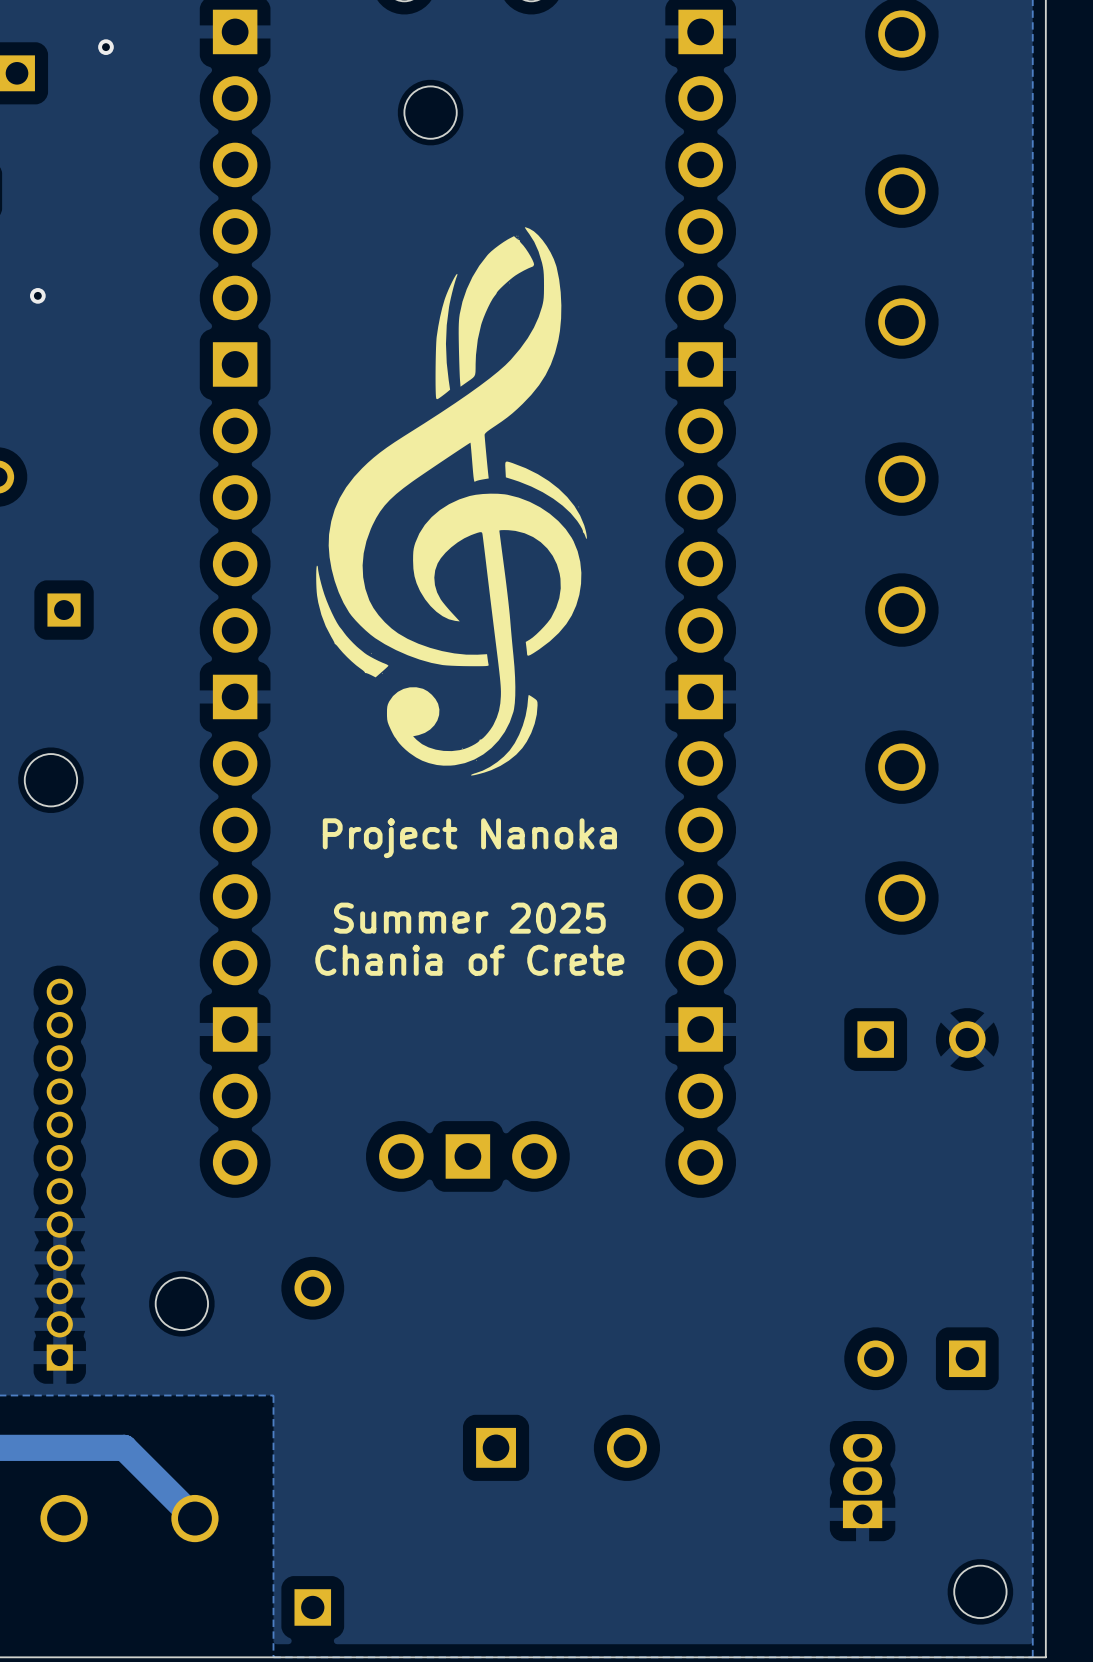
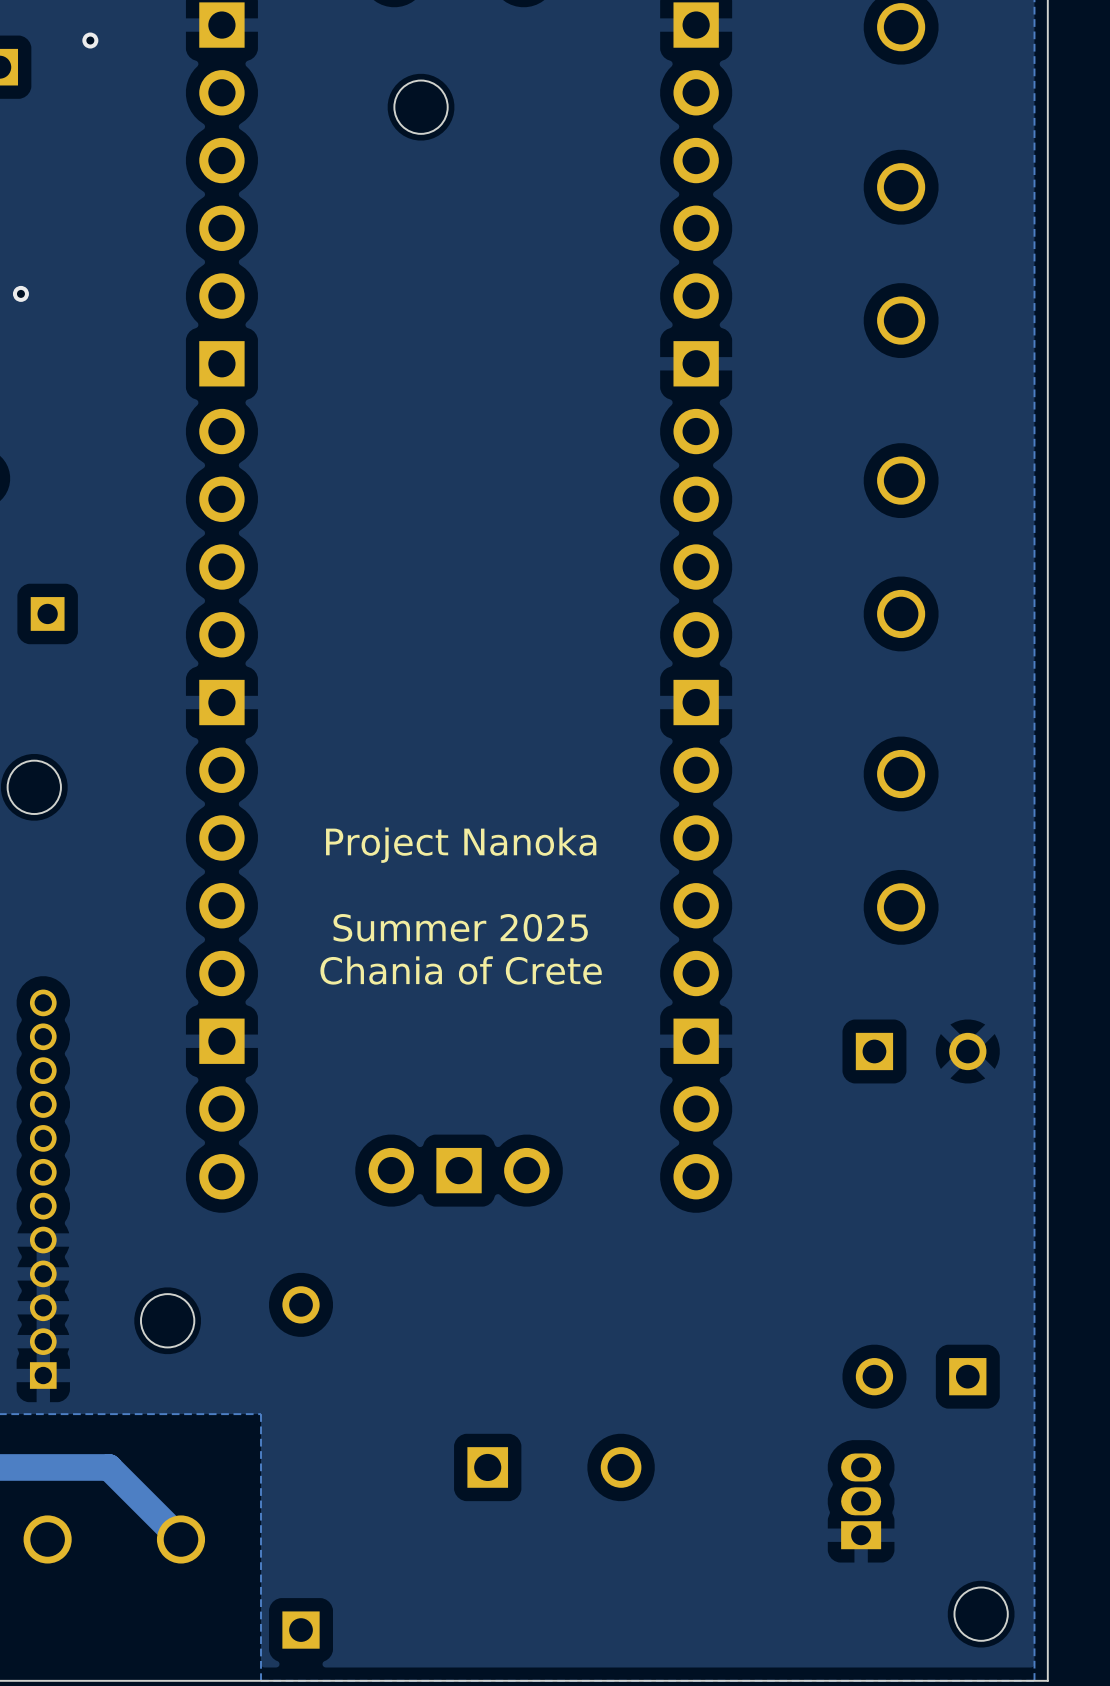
drawing: [316, 227, 587, 776] -> none

